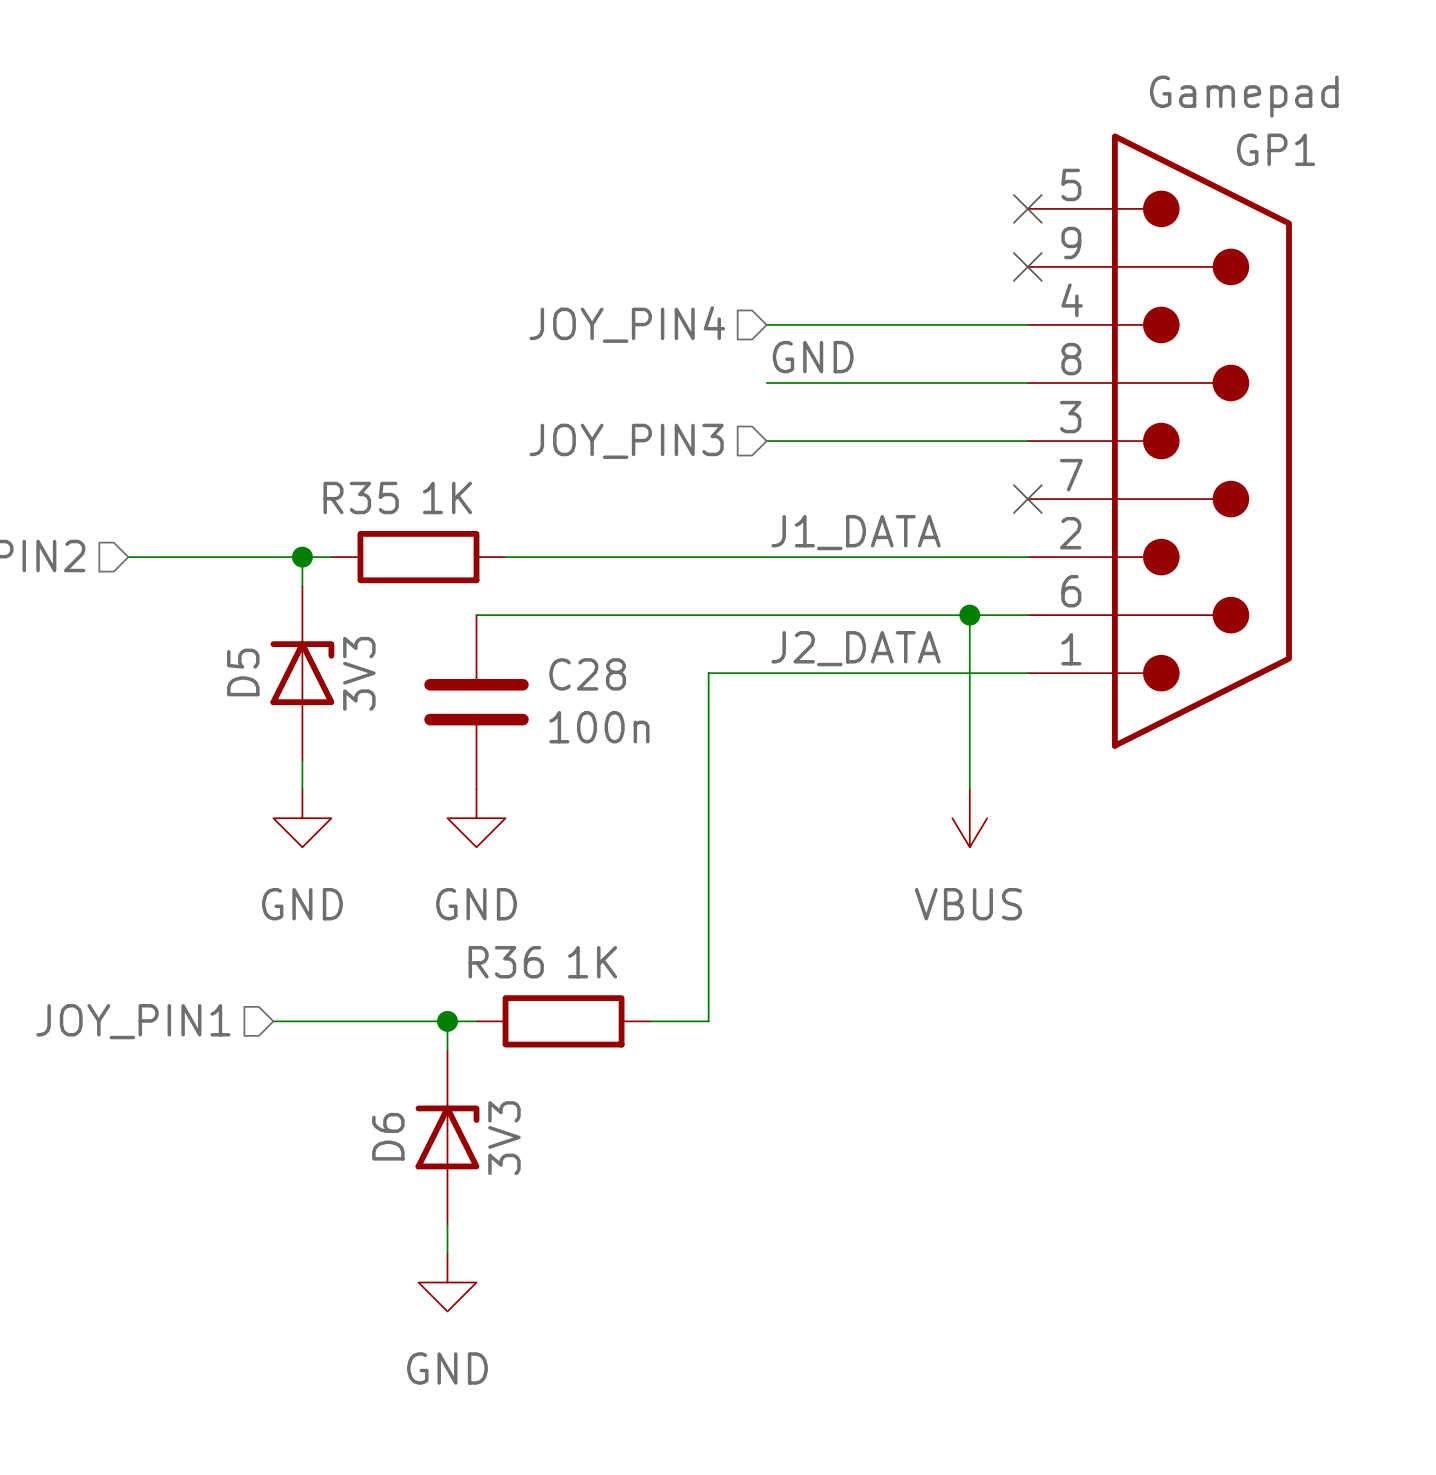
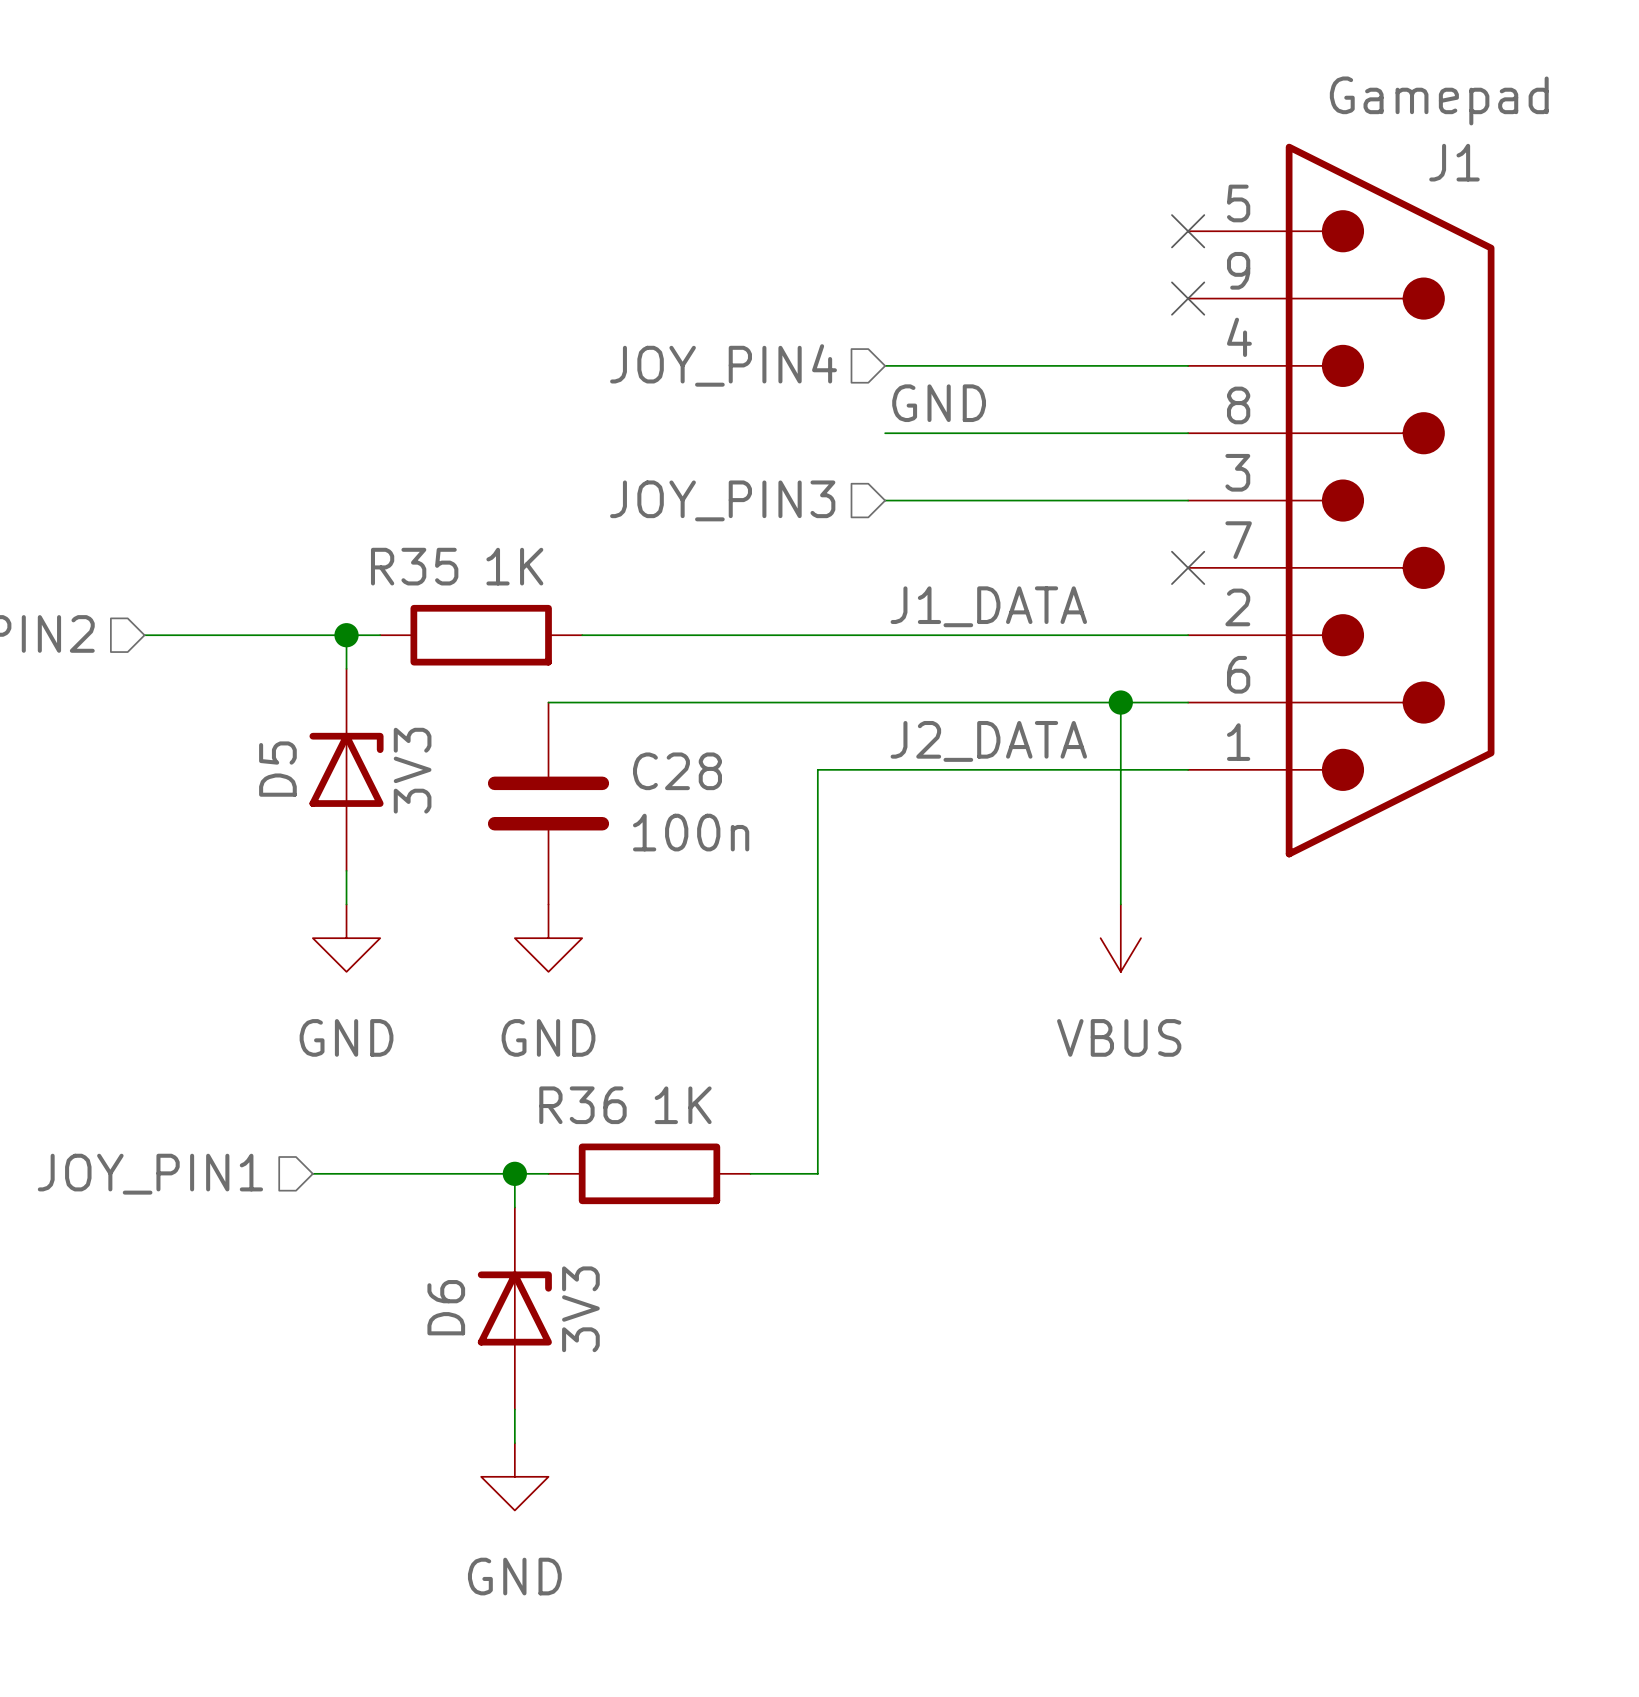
GP1 name: GP1 (1276, 149) -> J1 (1454, 162)

